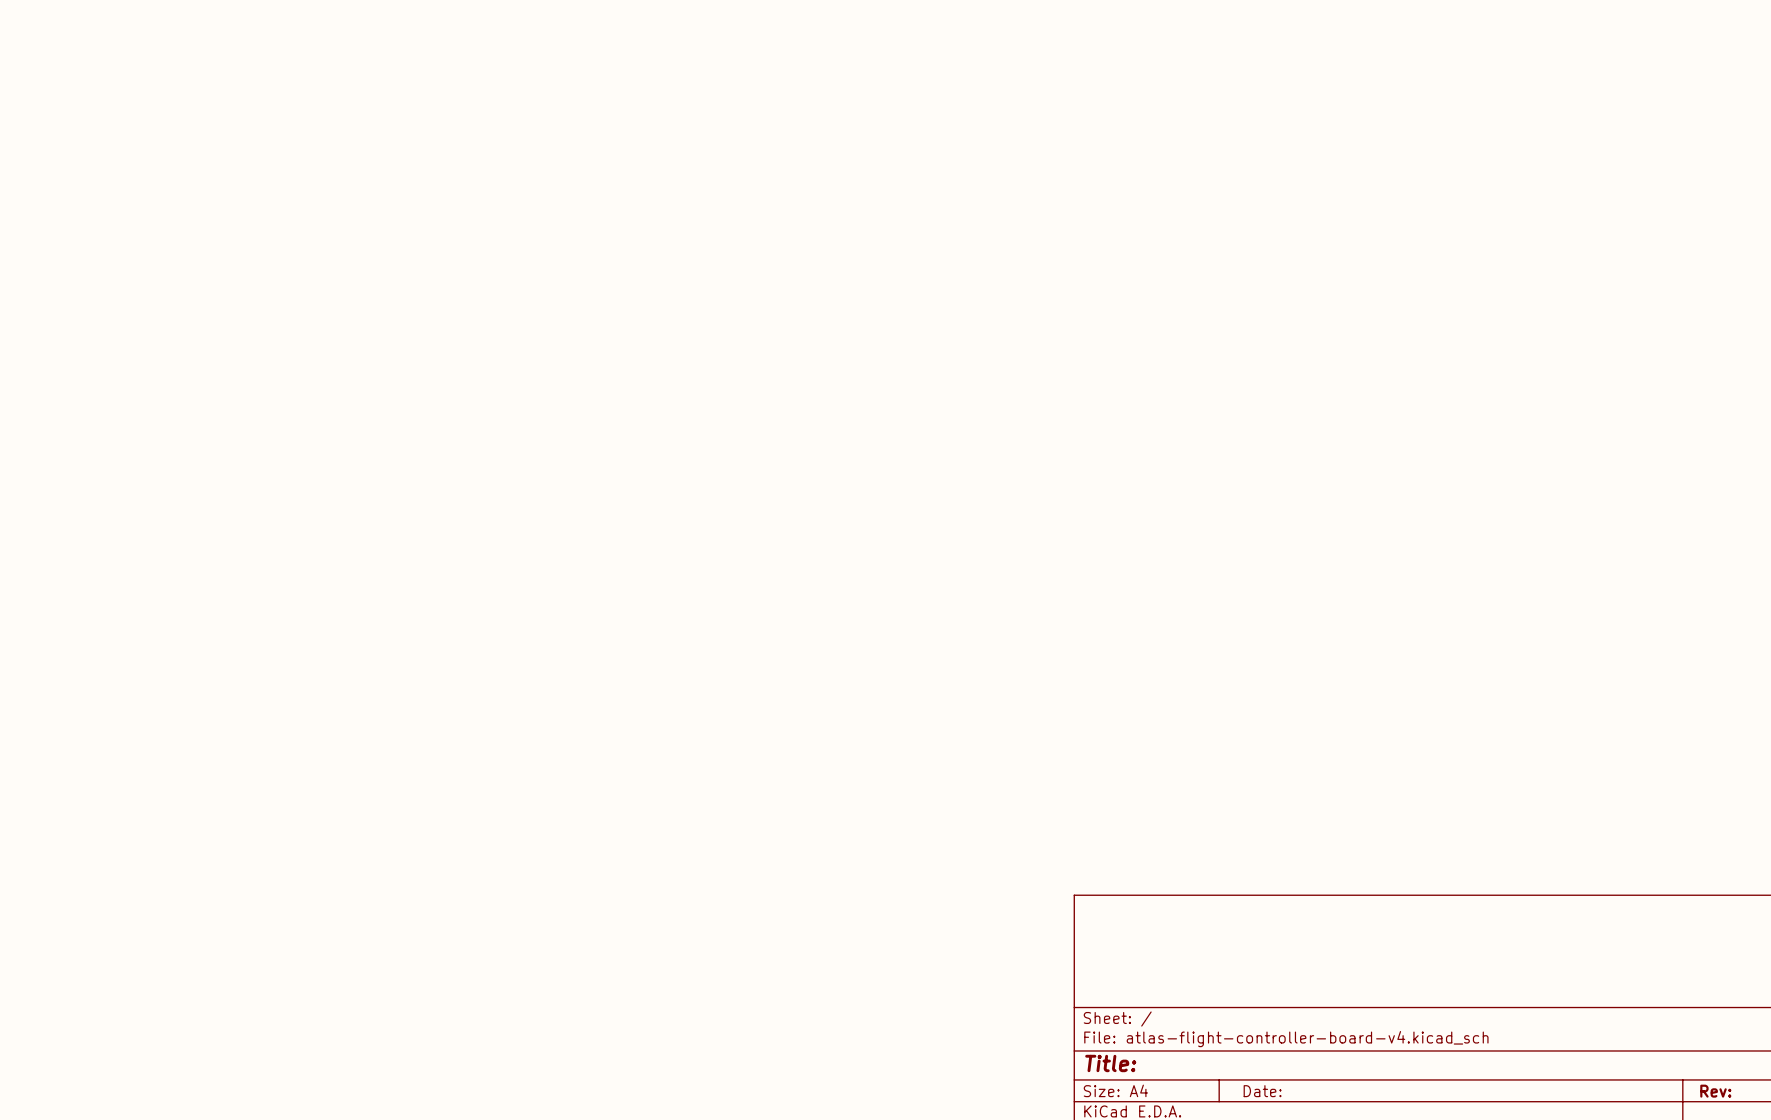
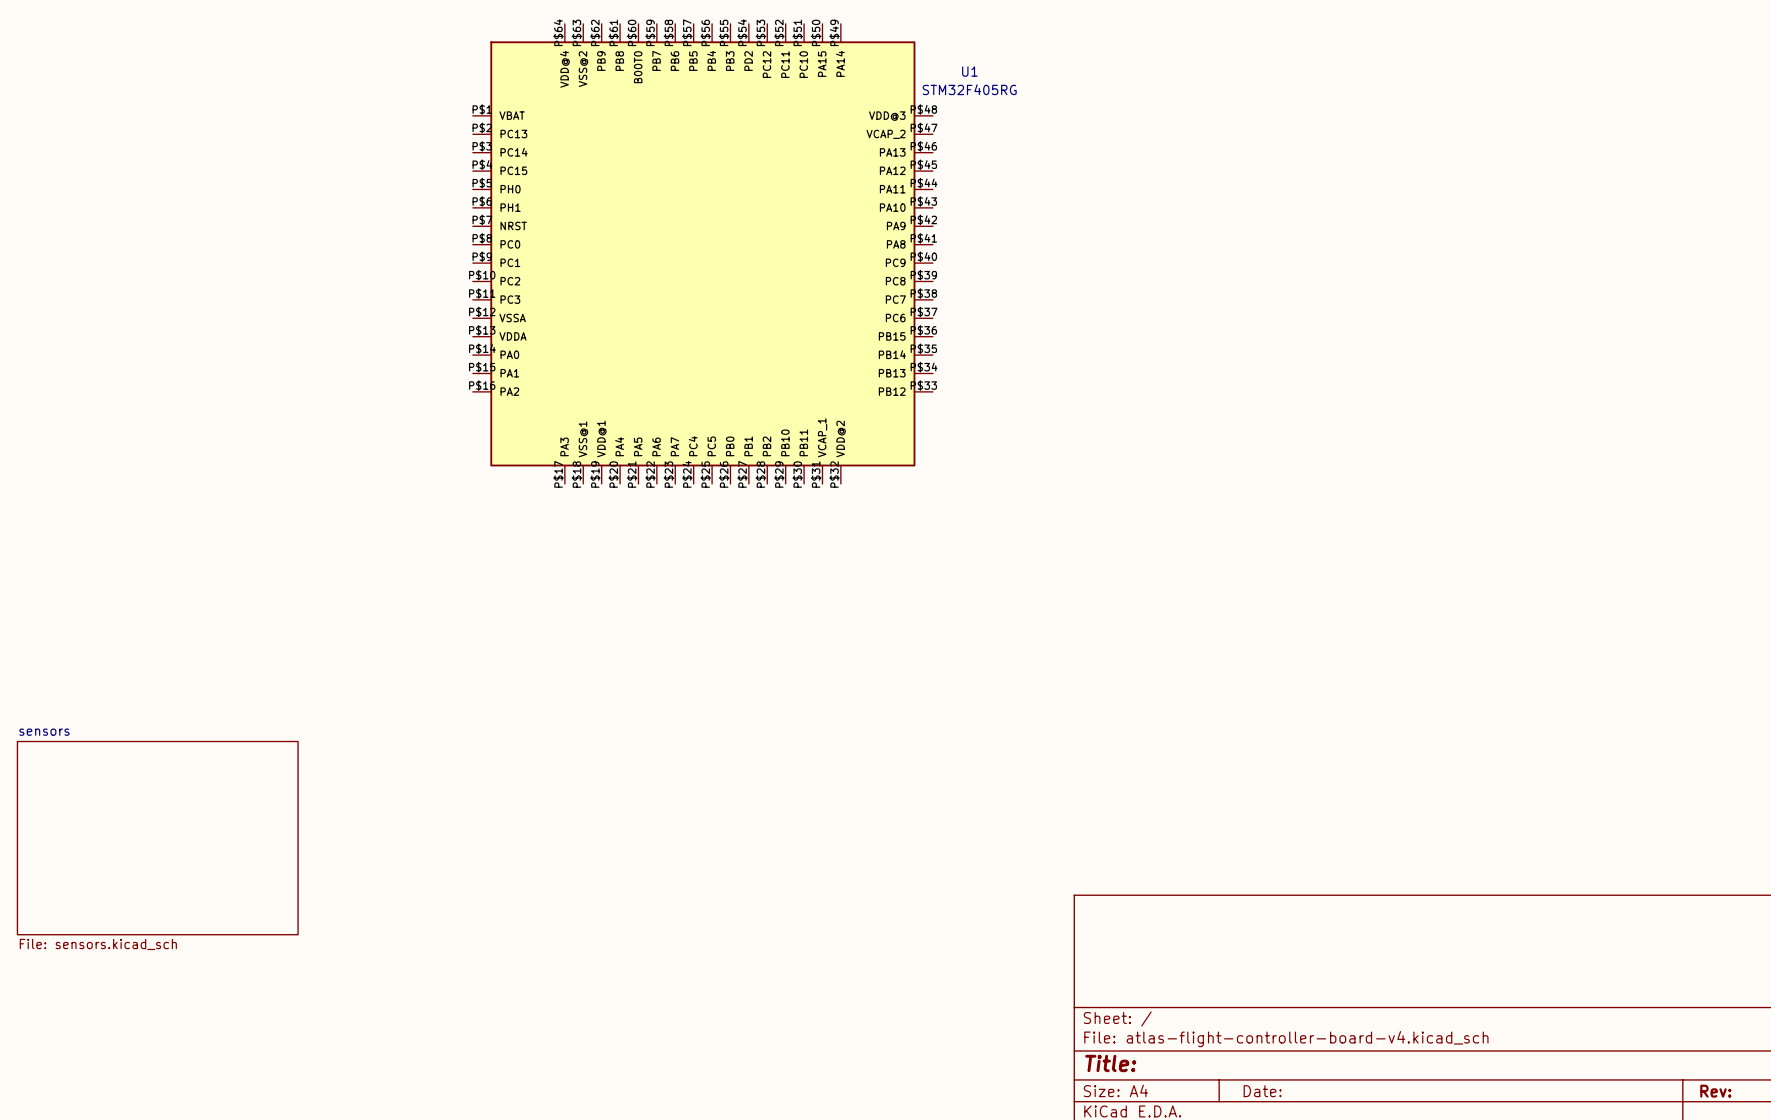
U1: none -> STM32F405RG (702, 253)
sheet sensors: none -> File: sensors.kicad_sch (157, 838)

